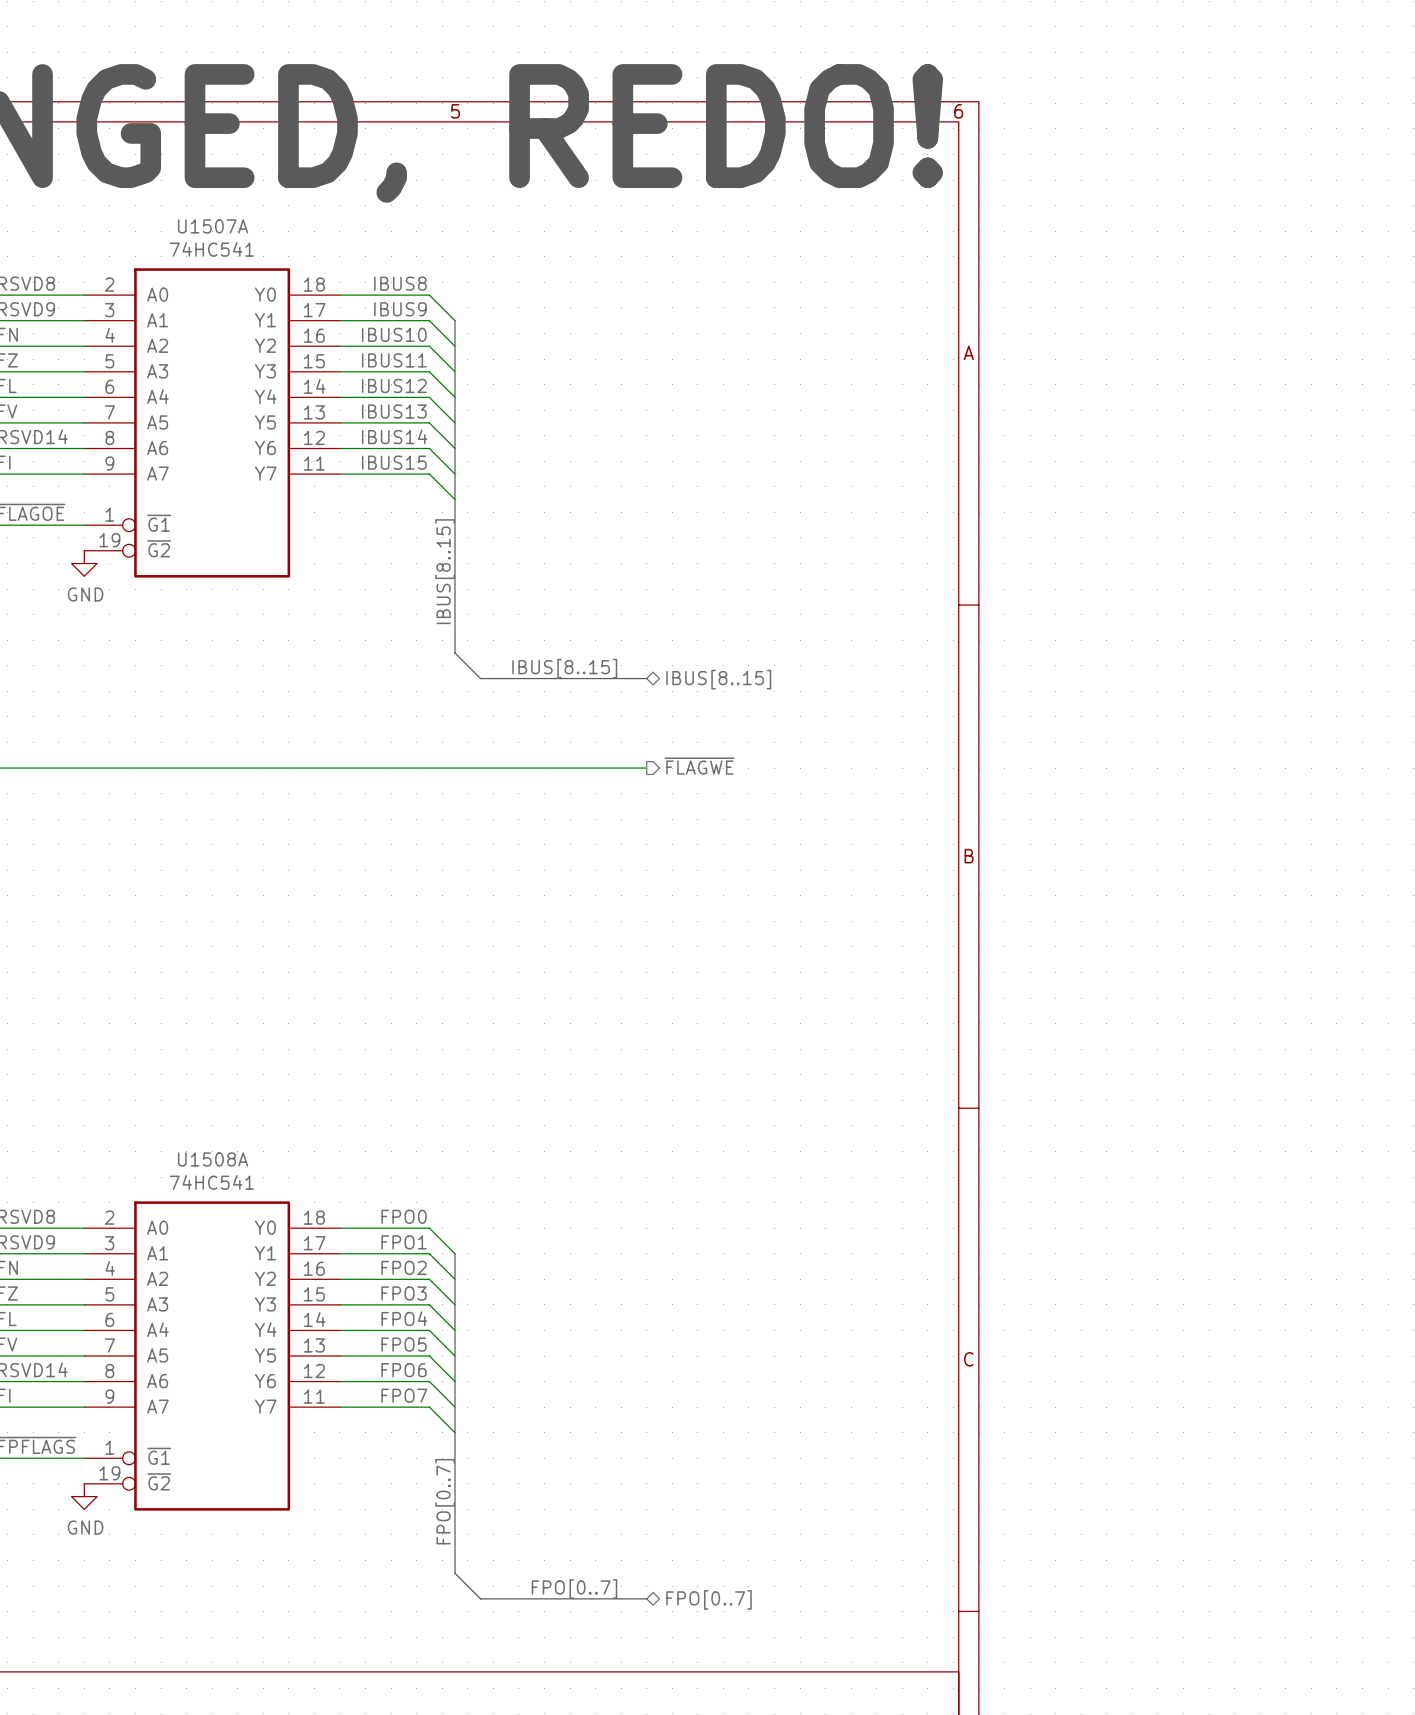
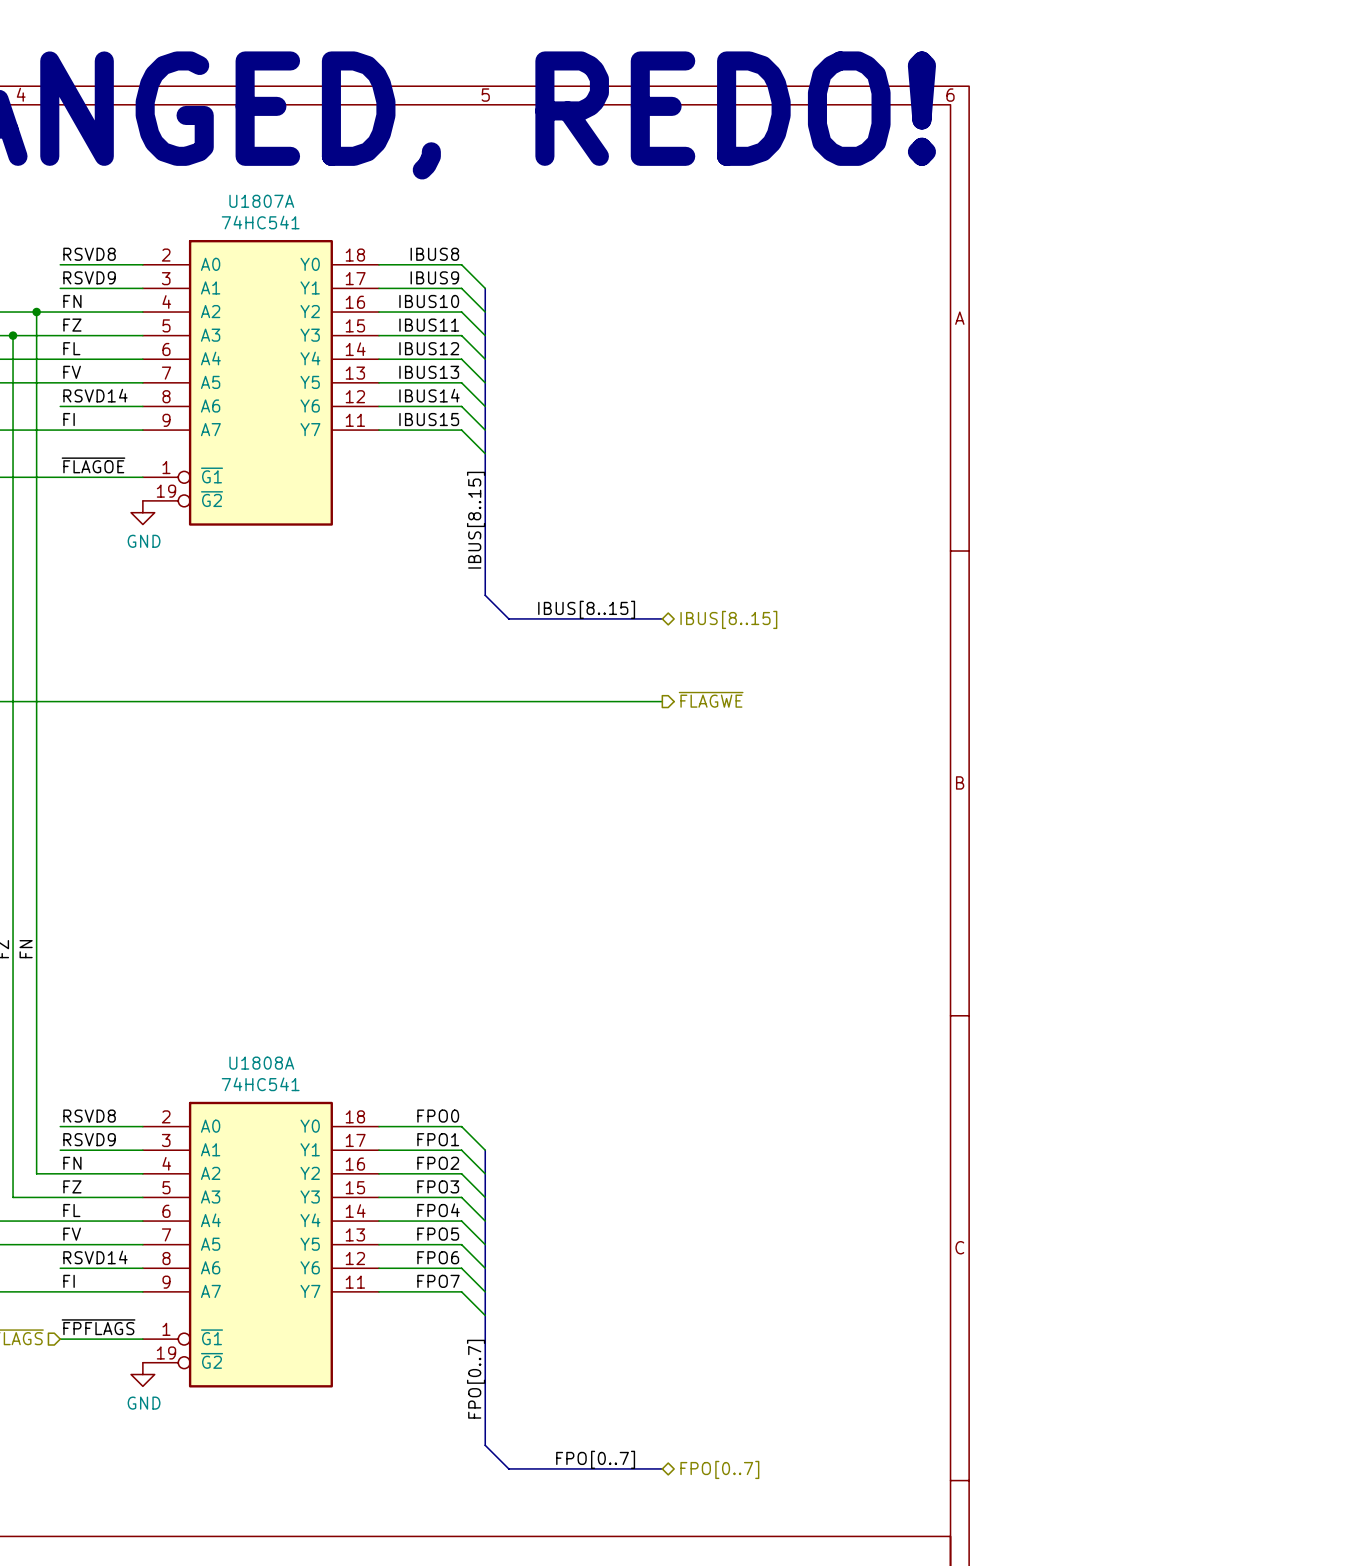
U1507A name: U1507A (213, 226) -> U1807A (261, 201)
U1508A name: U1508A (213, 1159) -> U1808A (261, 1063)

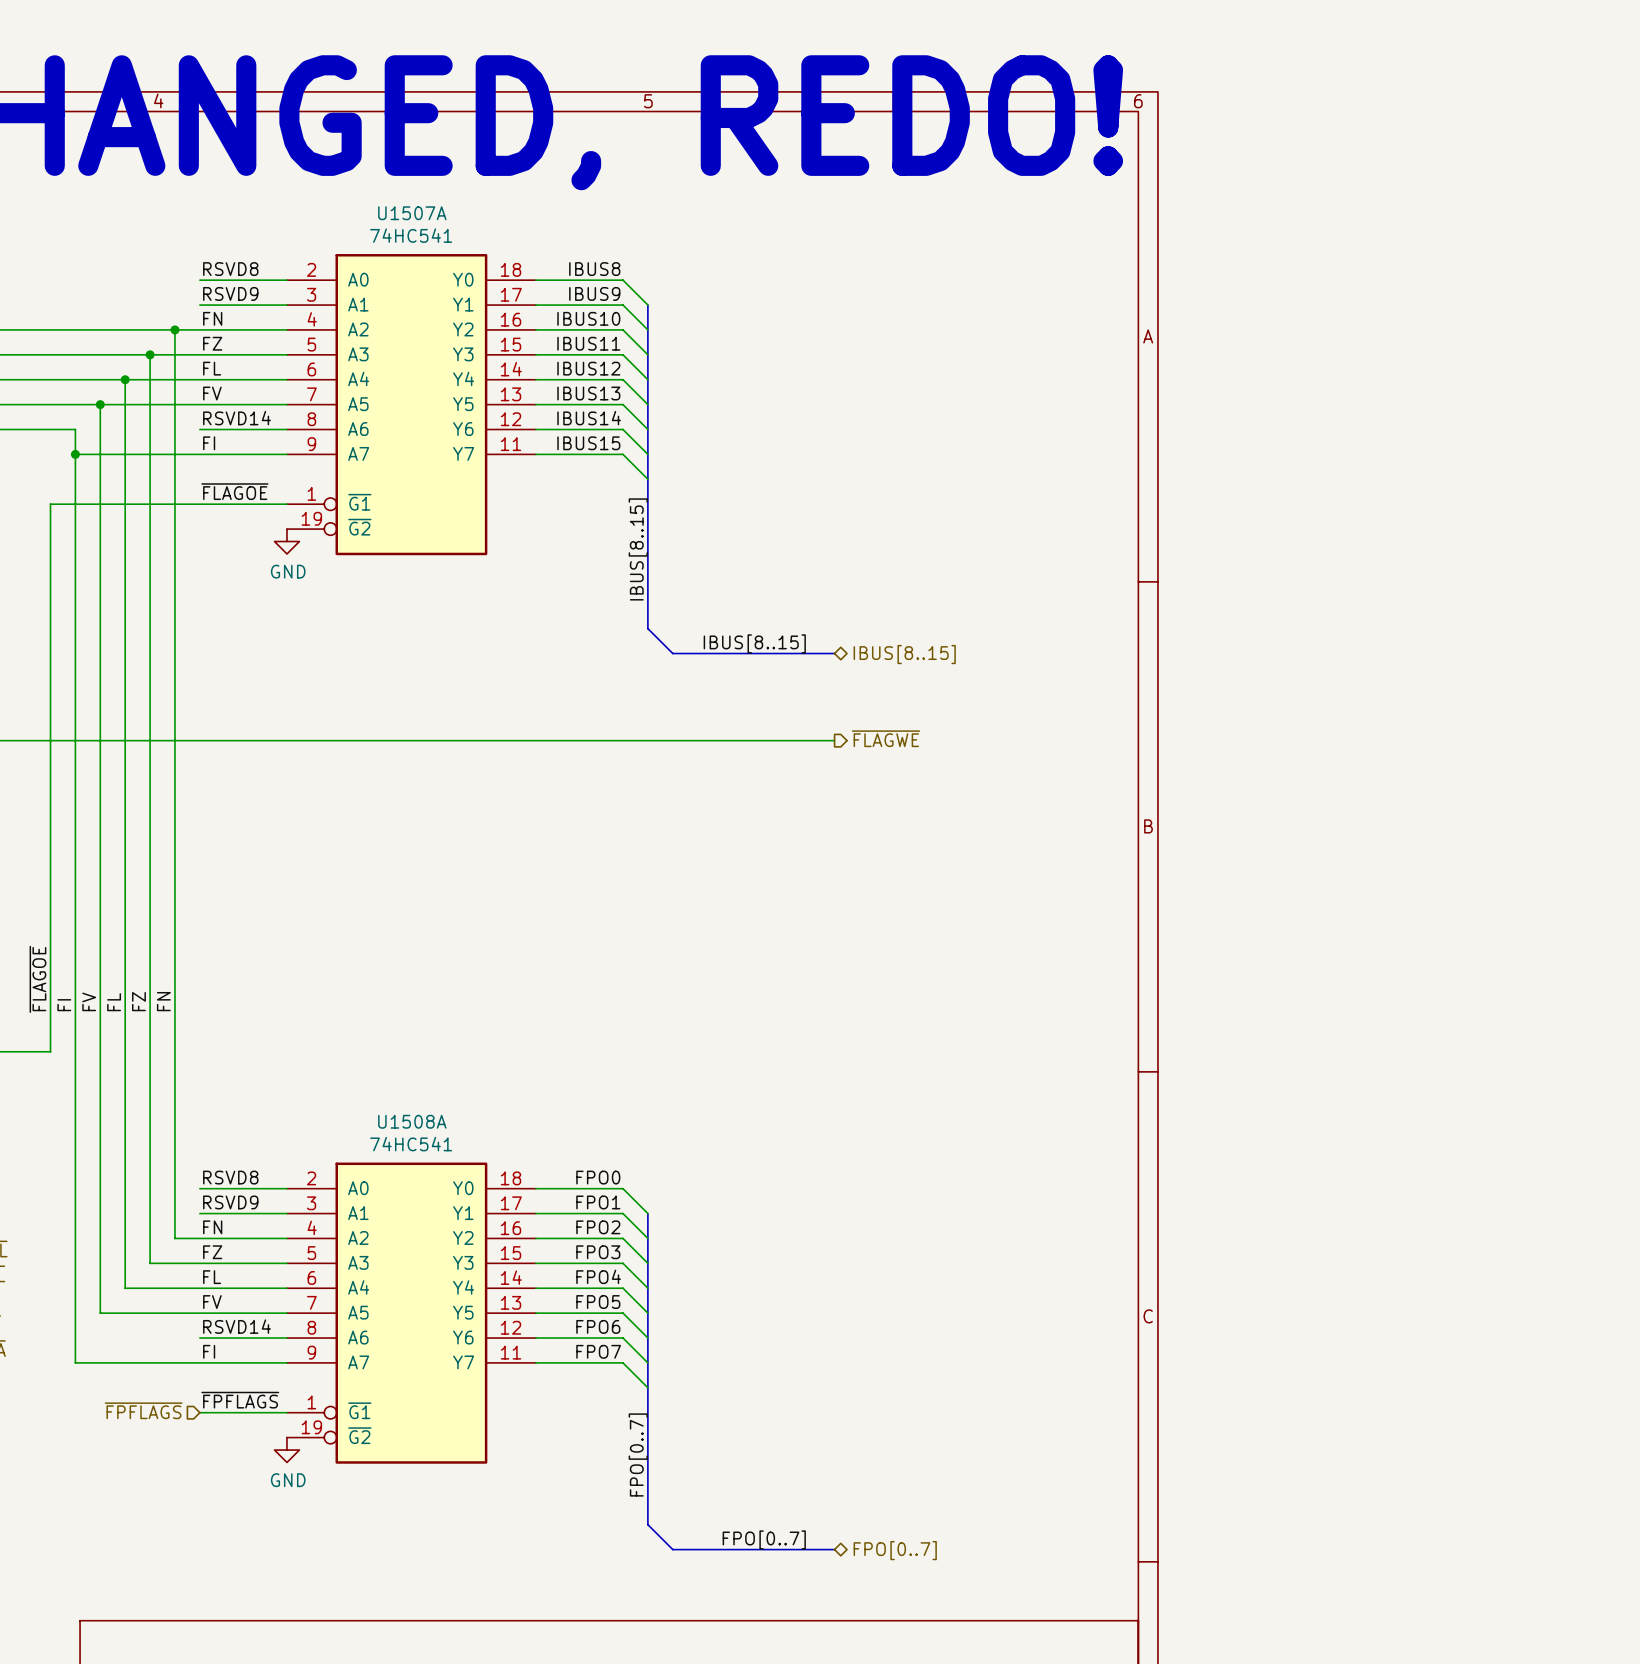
U1807A name: U1807A (261, 201) -> U1507A (412, 213)
U1808A name: U1808A (261, 1063) -> U1508A (412, 1121)

